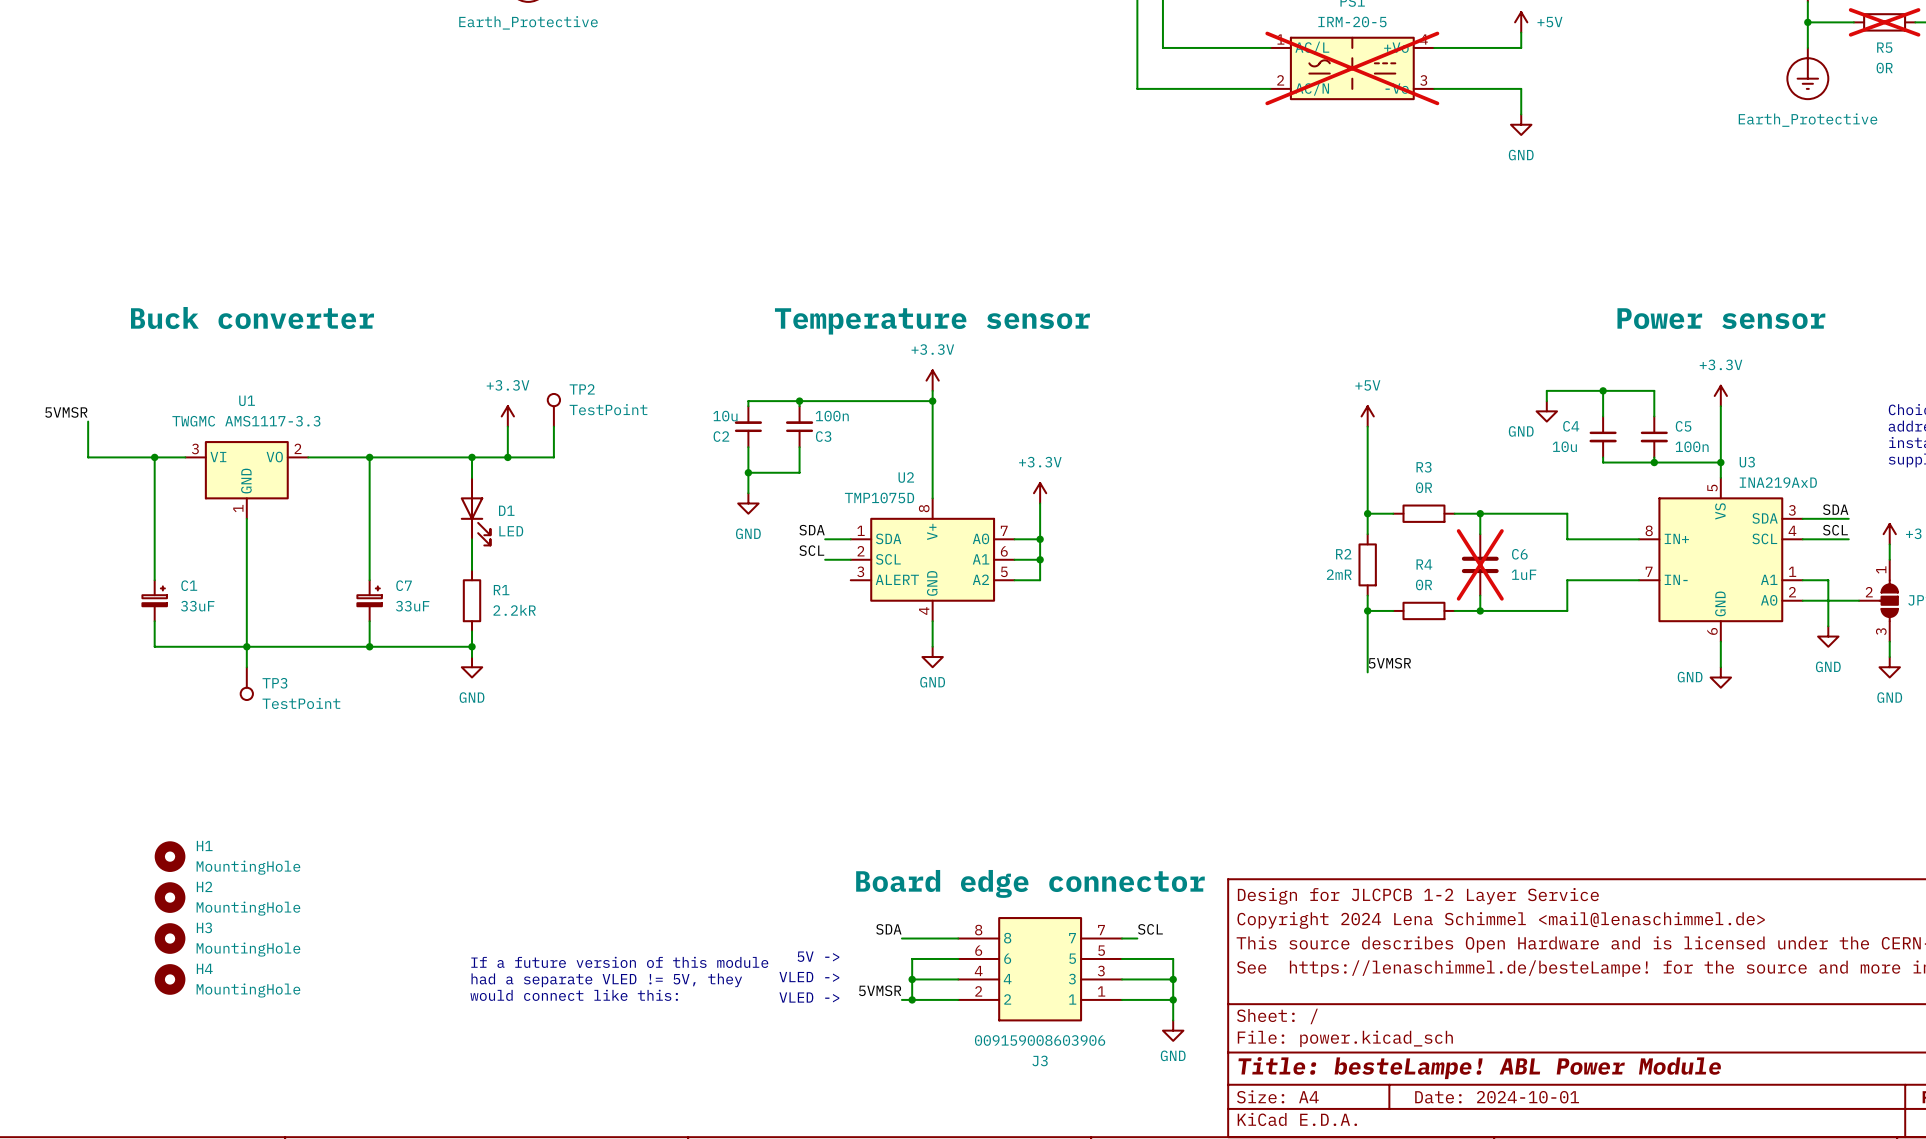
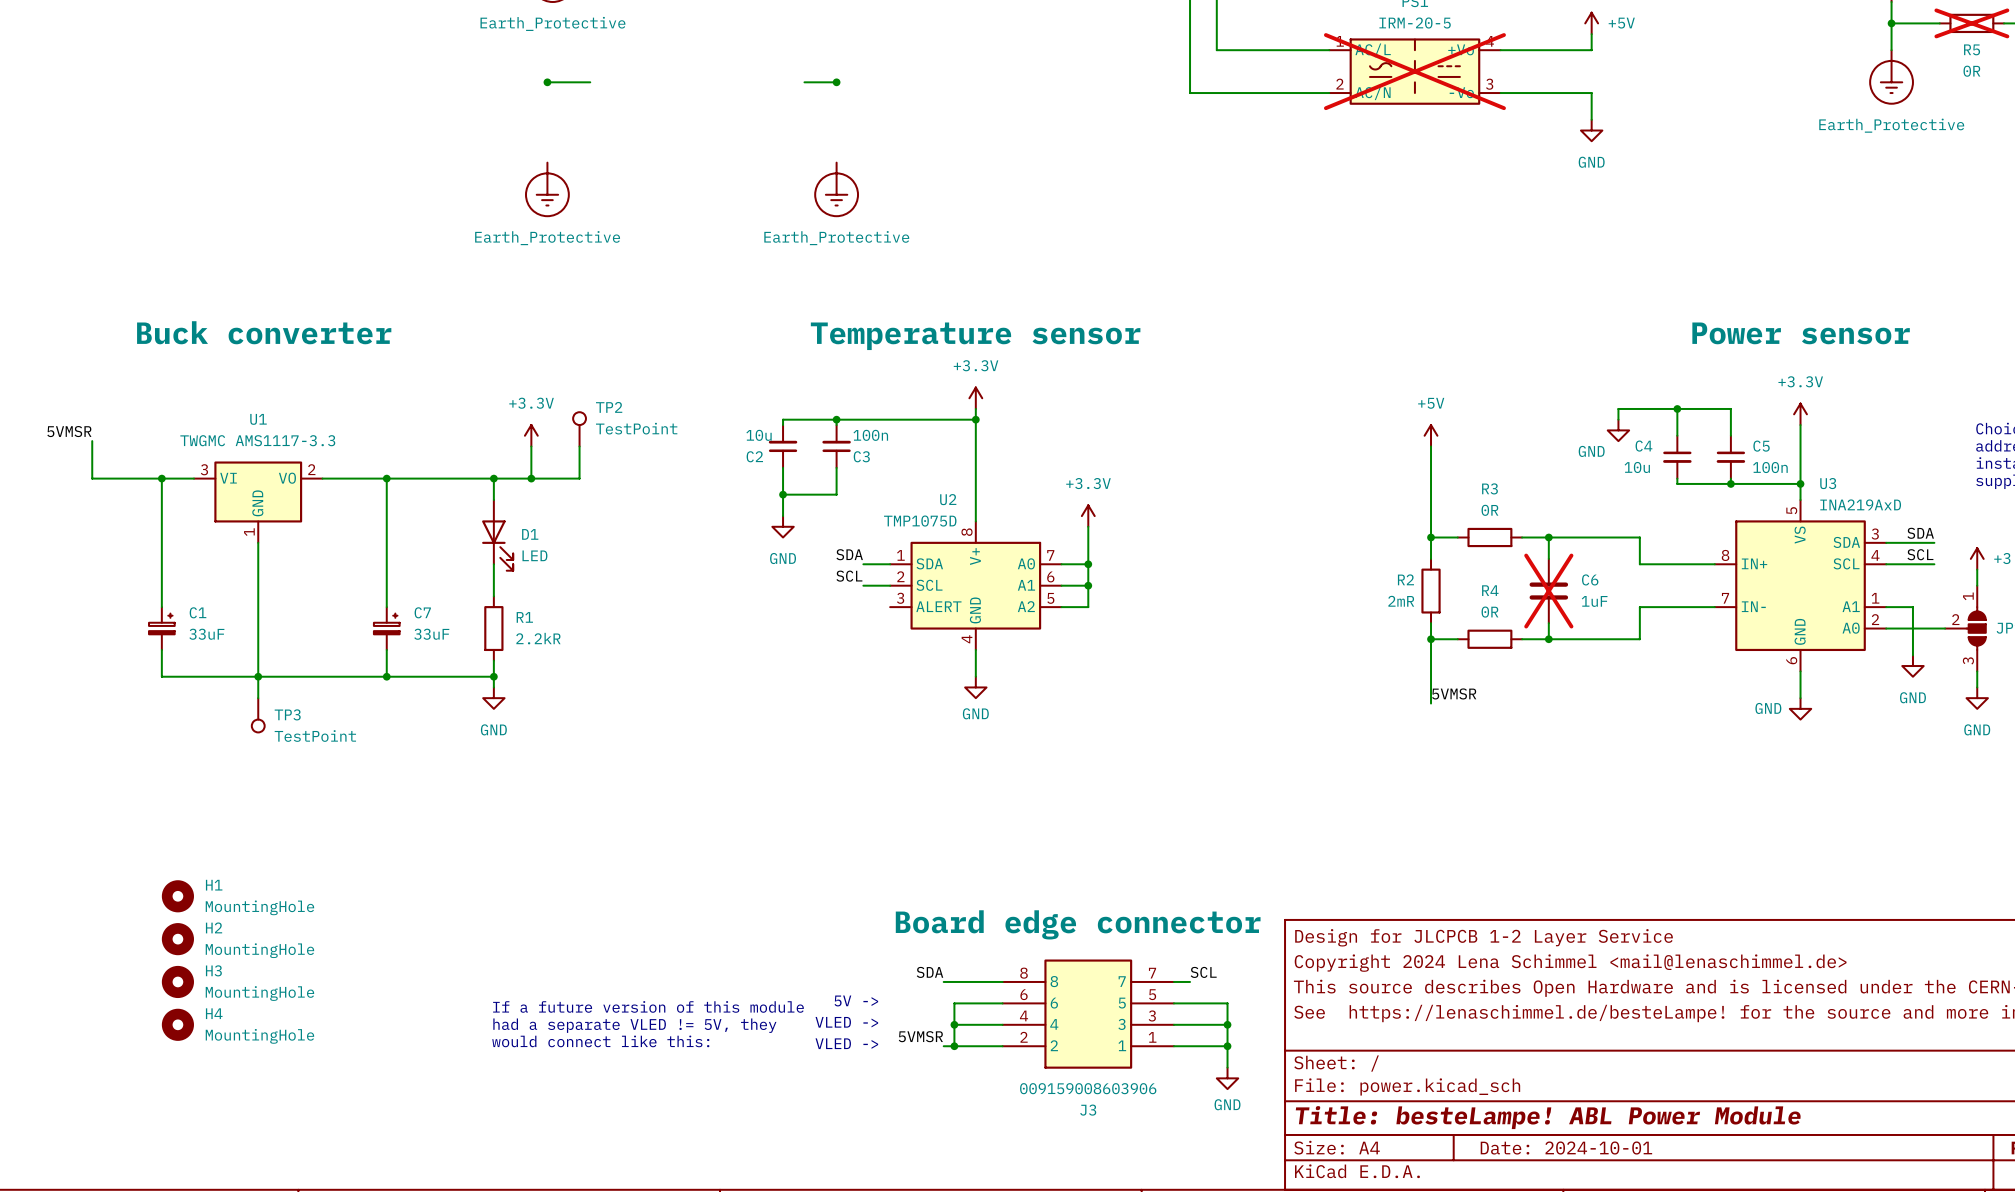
wire: none -> (547, 82) (590, 82)
junction: none -> (547, 82)
wire: none -> (804, 82) (836, 82)
junction: none -> (836, 82)
power symbol: none -> Earth_Protective (547, 189)
power symbol: none -> Earth_Protective (836, 189)

